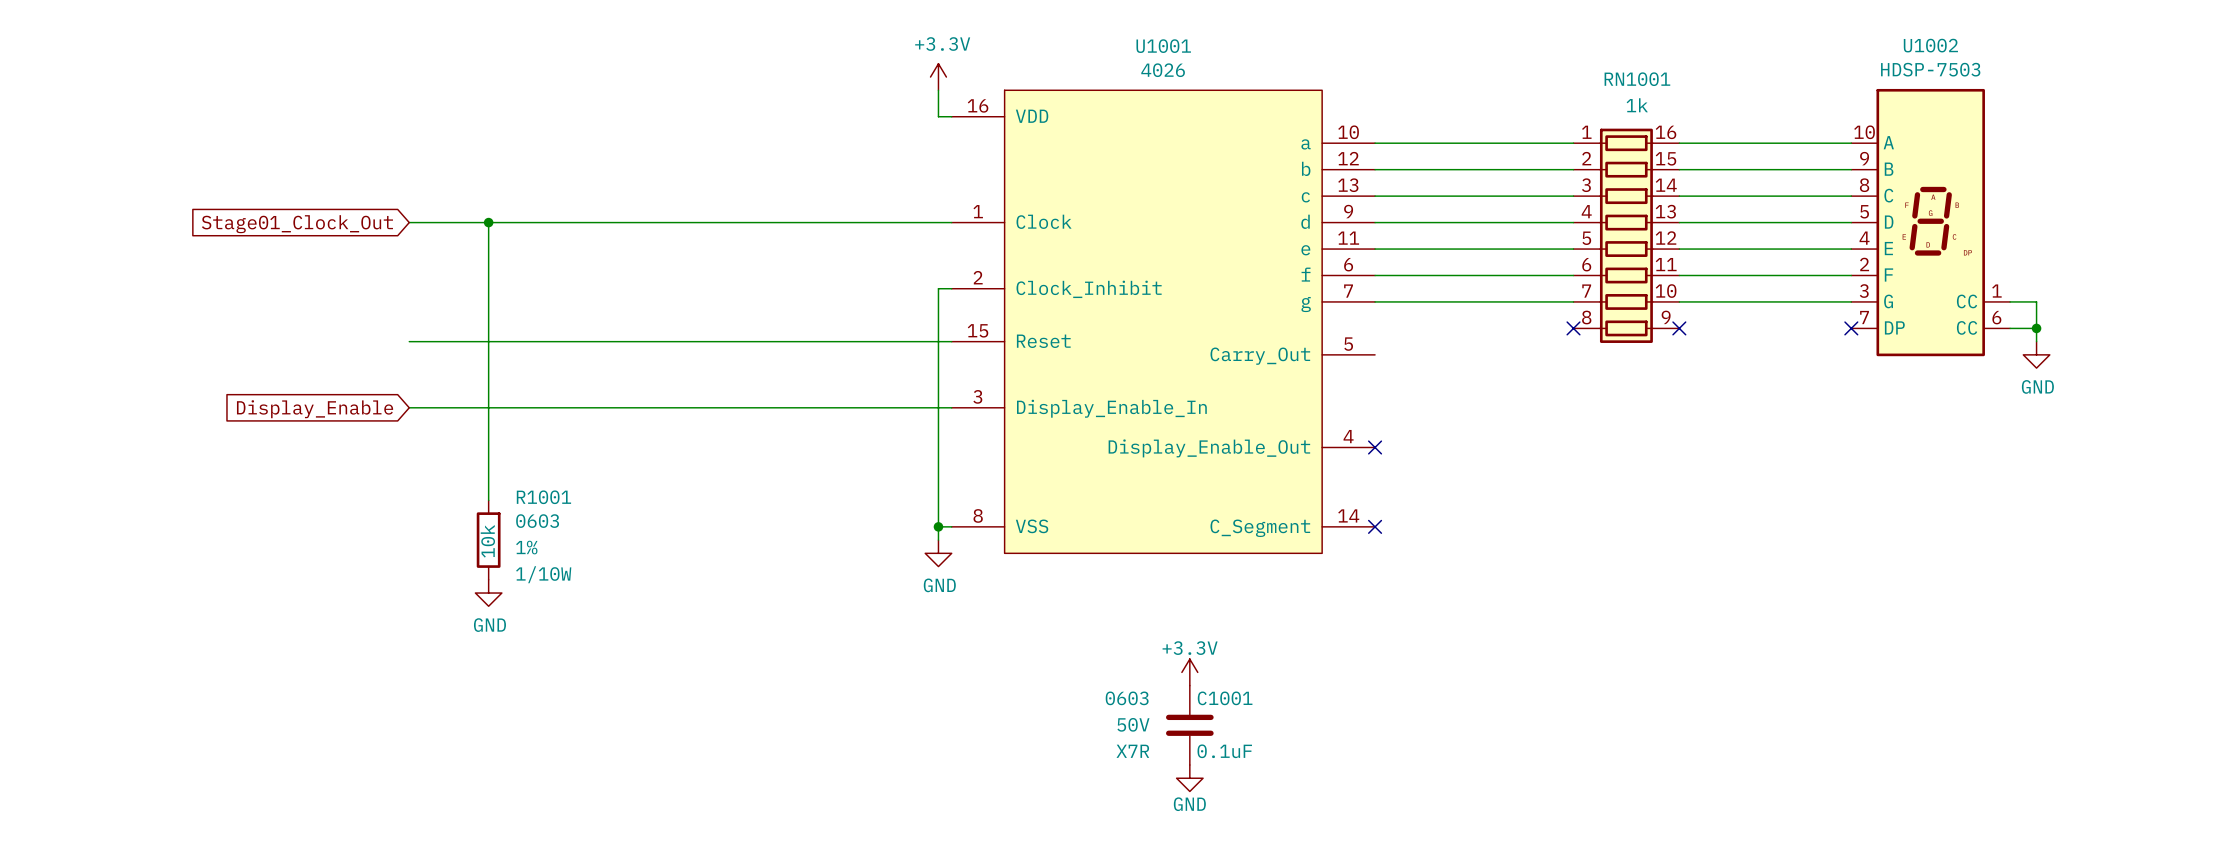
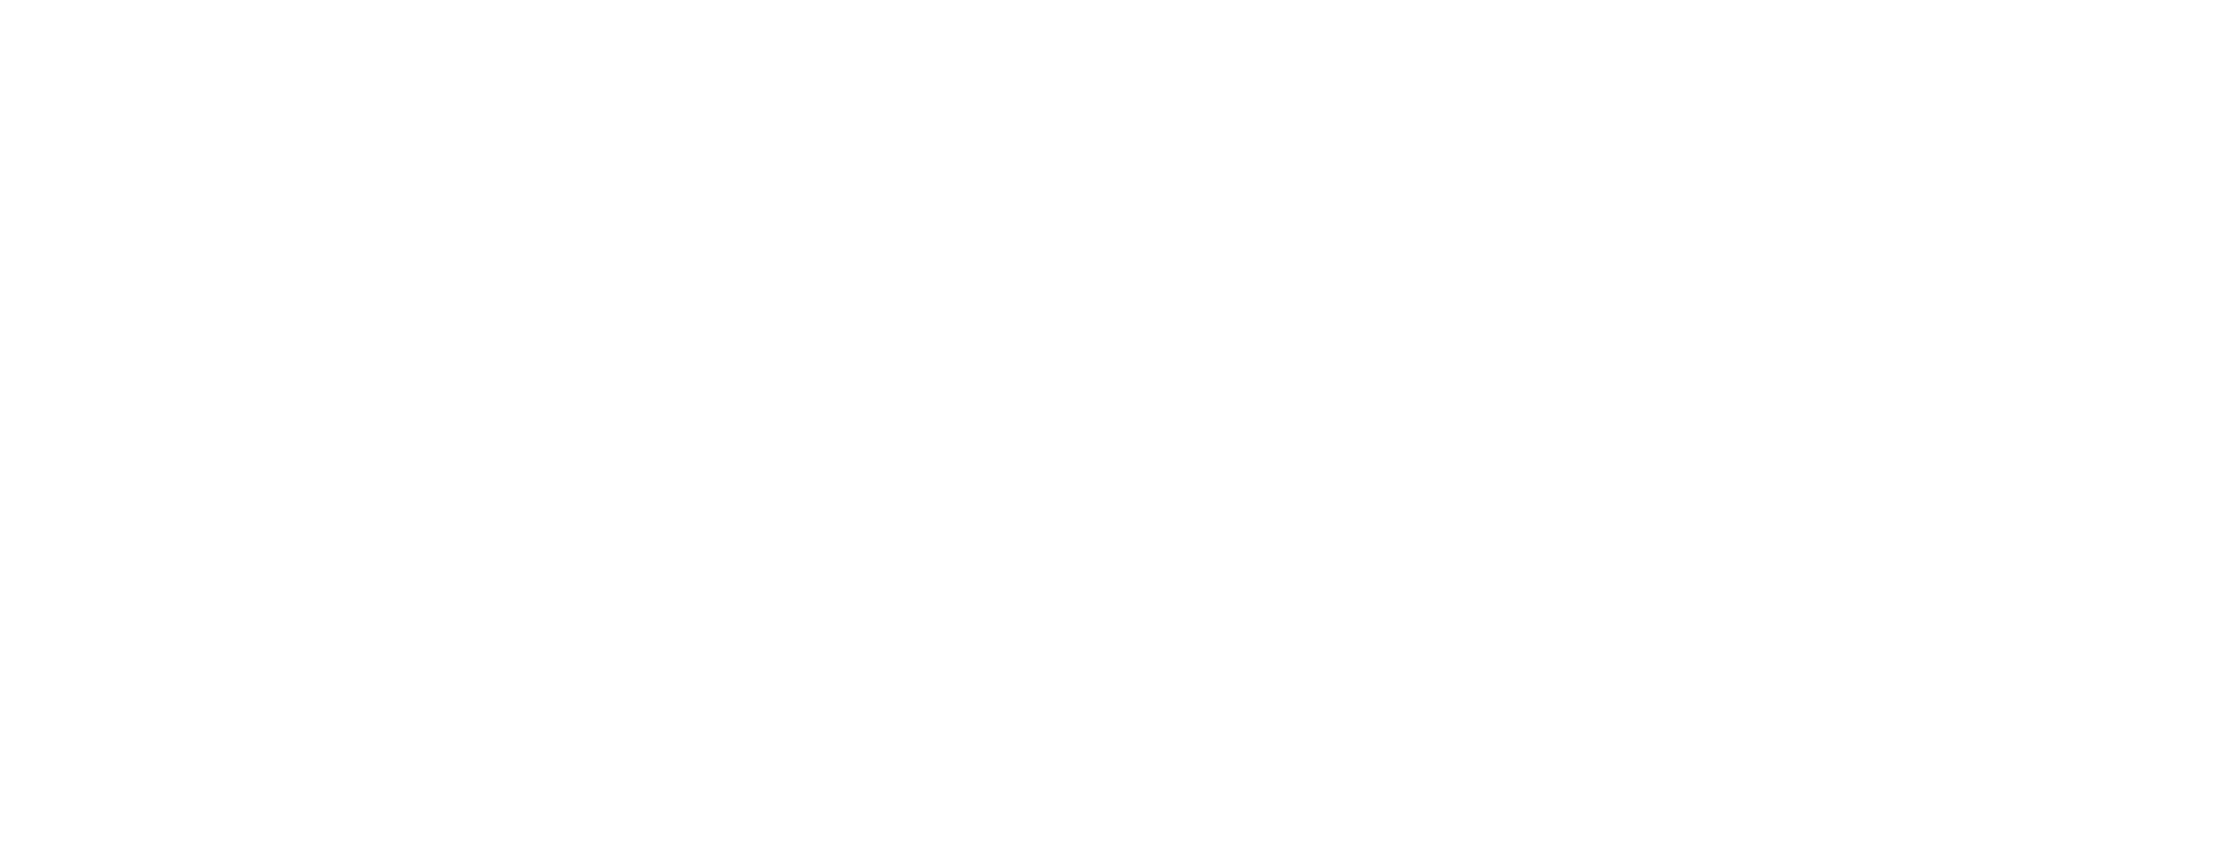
power symbol: +3.3V (938, 77) -> none
wire: (938, 90) (938, 116) (951, 116) -> none
wire: (1375, 143) (1573, 143) -> none
wire: (1679, 143) (1851, 143) -> none
wire: (1375, 169) (1573, 169) -> none
wire: (1679, 169) (1851, 169) -> none
wire: (1375, 196) (1573, 196) -> none
wire: (1679, 196) (1851, 196) -> none
wire: (409, 222) (951, 222) -> none
wire: (488, 222) (488, 500) -> none
junction: (488, 222) -> none
wire: (1375, 222) (1573, 222) -> none
wire: (1679, 222) (1851, 222) -> none
U1002: HDSP-7503 (1930, 222) -> none
global label: Stage01_Clock_Out (297, 224) -> none
RN1001: 1k (1626, 235) -> none
wire: (1375, 249) (1573, 249) -> none
wire: (1679, 249) (1851, 249) -> none
wire: (1375, 275) (1573, 275) -> none
wire: (1679, 275) (1851, 275) -> none
wire: (951, 288) (938, 288) (938, 540) -> none
wire: (1375, 301) (1573, 301) -> none
wire: (1679, 301) (1851, 301) -> none
wire: (2010, 301) (2036, 301) (2036, 341) -> none
U1001: 4026 (1163, 321) -> none
no-connect mark: (1573, 328) -> none
no-connect mark: (1679, 328) -> none
no-connect mark: (1851, 328) -> none
wire: (2010, 328) (2036, 328) -> none
junction: (2036, 328) -> none
wire: (409, 341) (951, 341) -> none
power symbol: GND (2036, 354) -> none
wire: (409, 407) (951, 407) -> none
global label: Display_Enable (315, 409) -> none
no-connect mark: (1375, 447) -> none
wire: (938, 526) (951, 526) -> none
junction: (938, 526) -> none
no-connect mark: (1375, 526) -> none
R1001: 10k (488, 540) -> none
power symbol: GND (938, 553) -> none
power symbol: GND (488, 593) -> none
power symbol: +3.3V (1189, 672) -> none
C1001: 0.1uF (1189, 725) -> none
power symbol: GND (1189, 778) -> none

